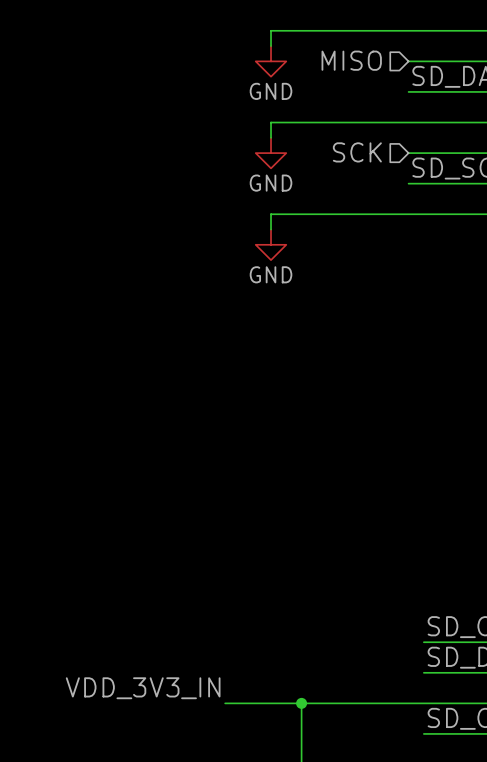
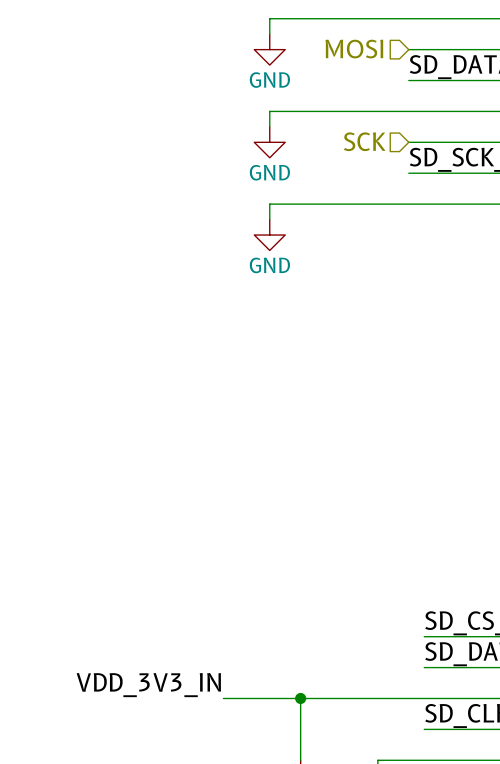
hierarchical label: MISO (351, 60) -> MOSI (354, 49)

